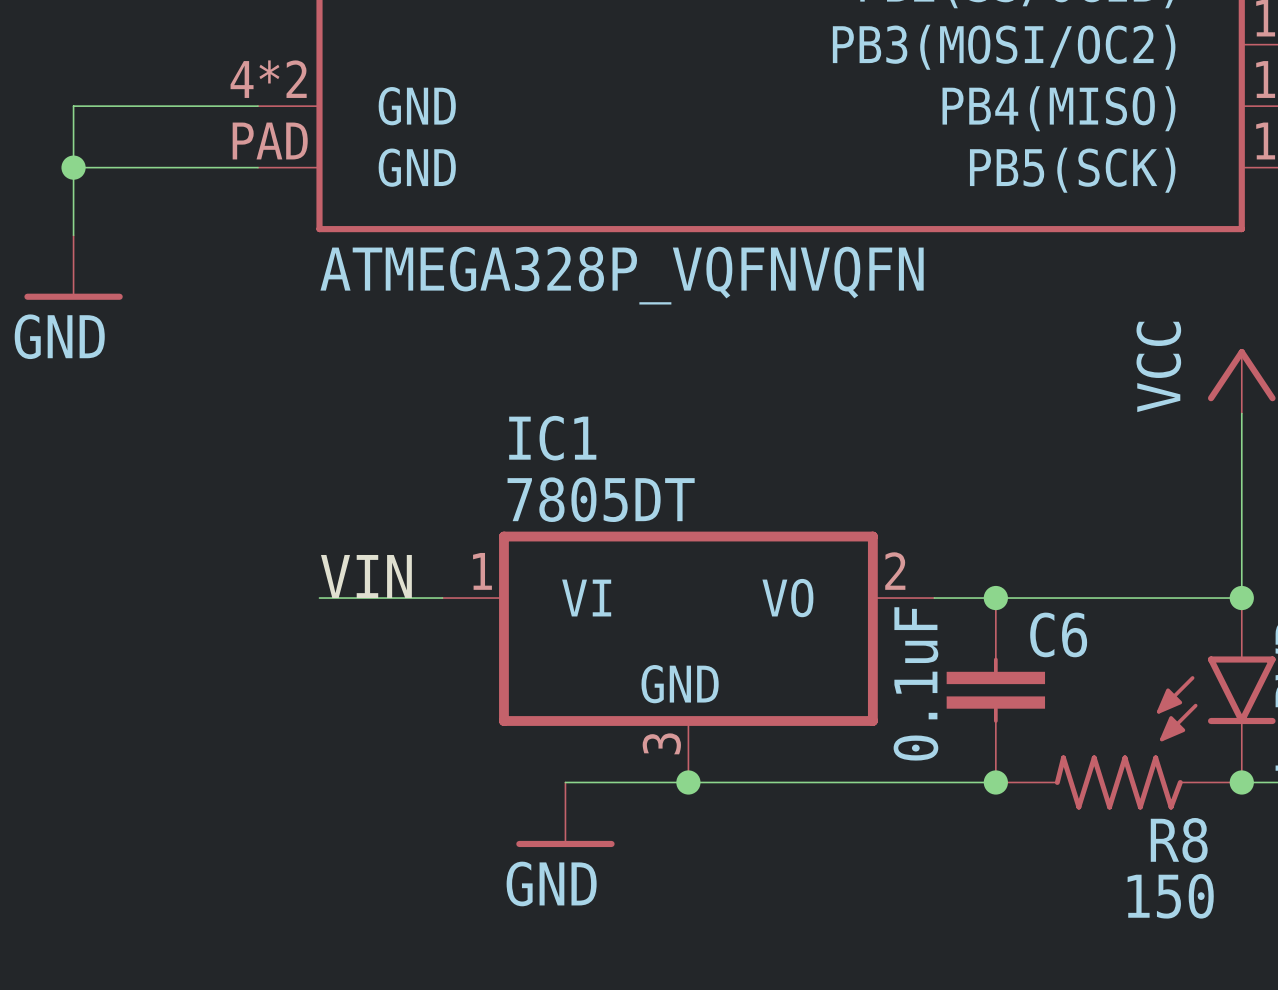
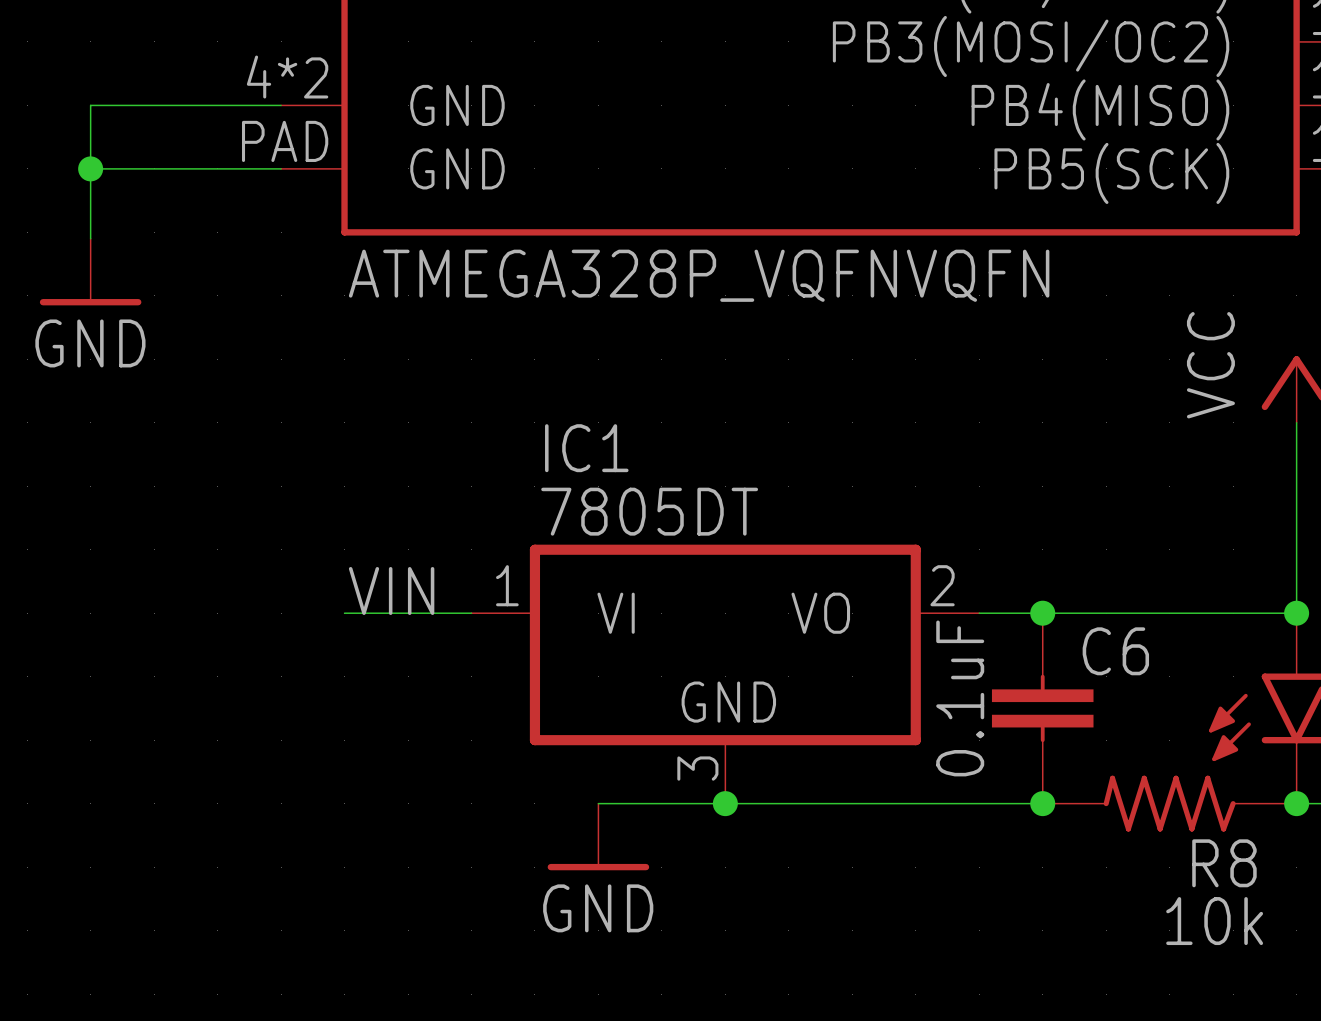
R8 value: 150 (1170, 896) -> 10k (1214, 921)

